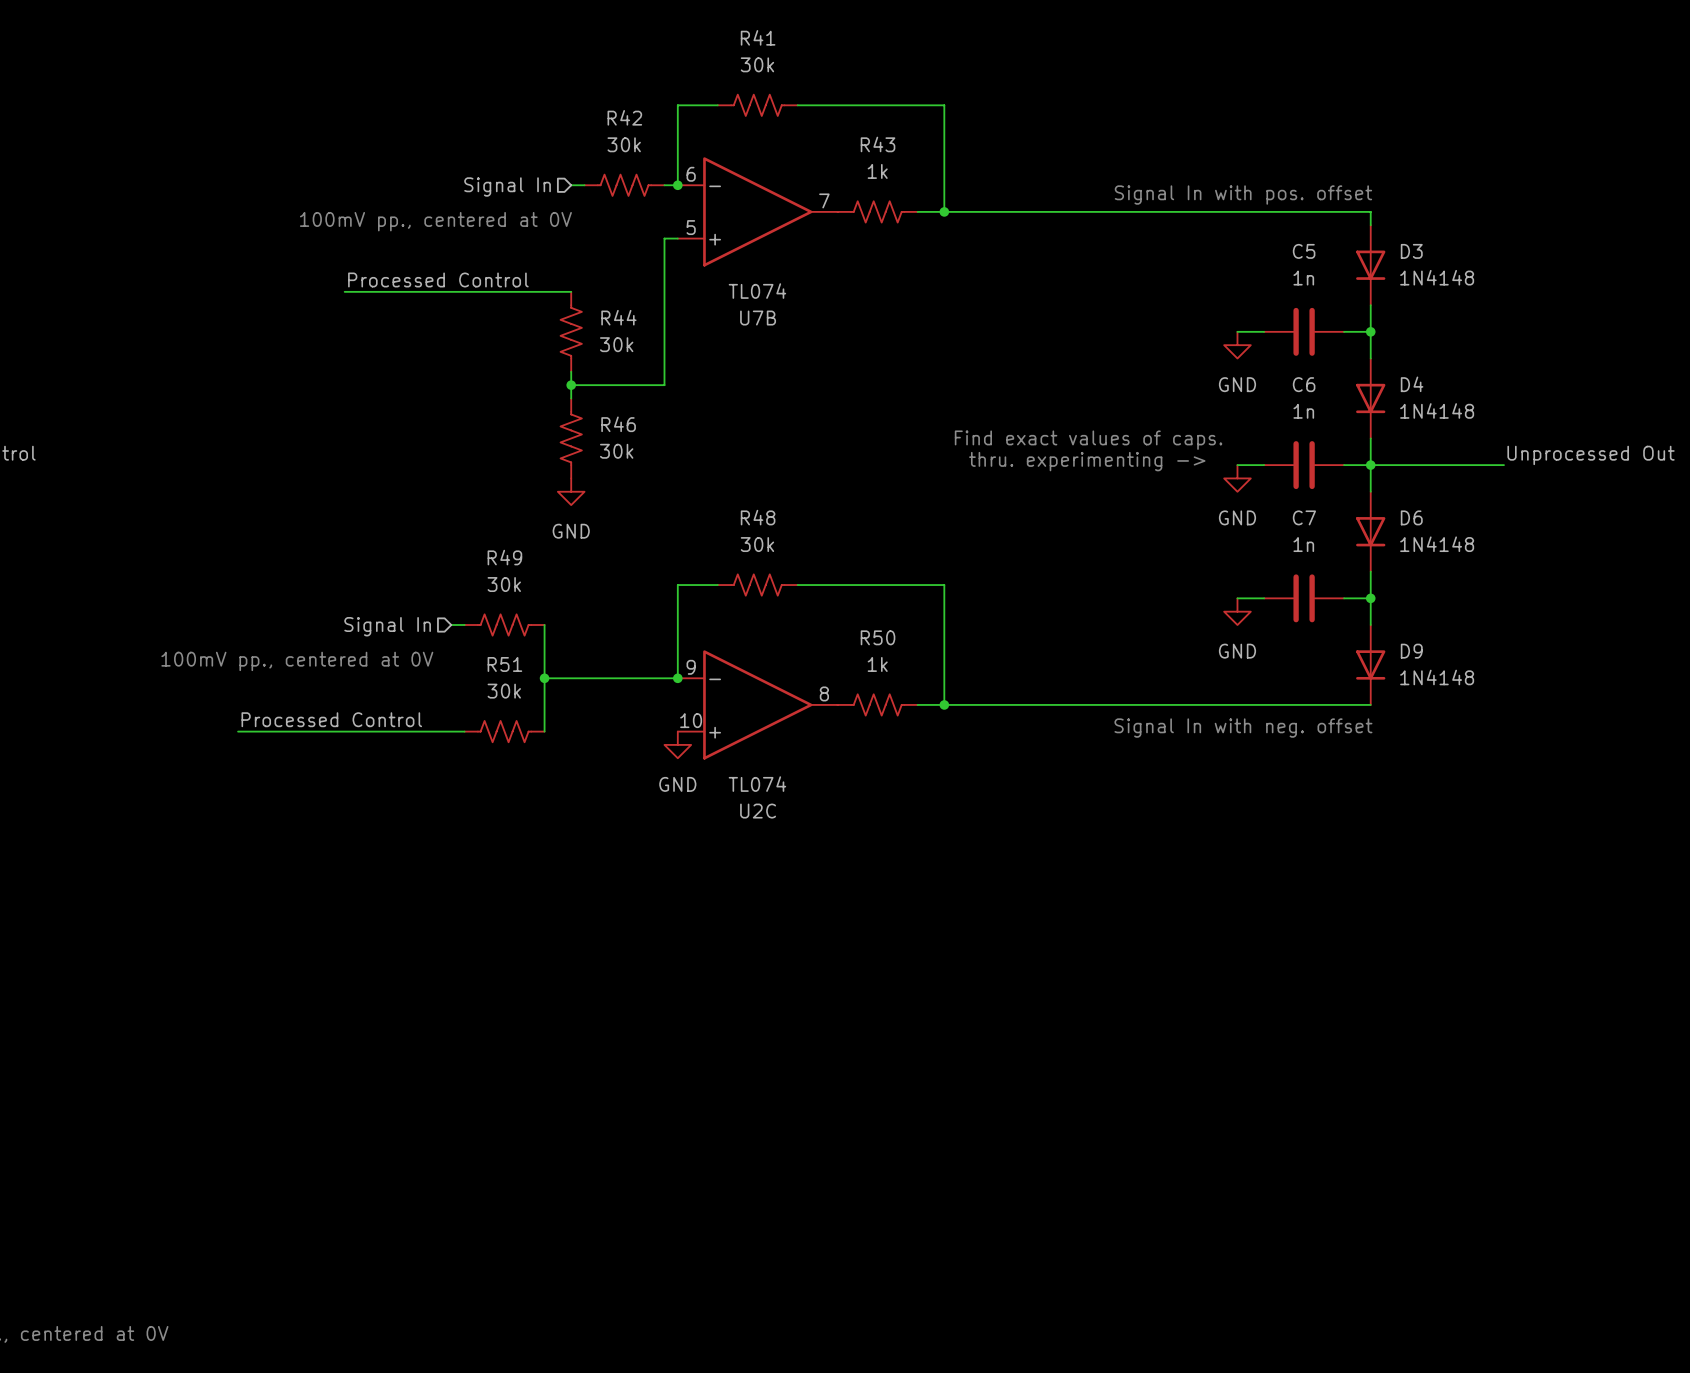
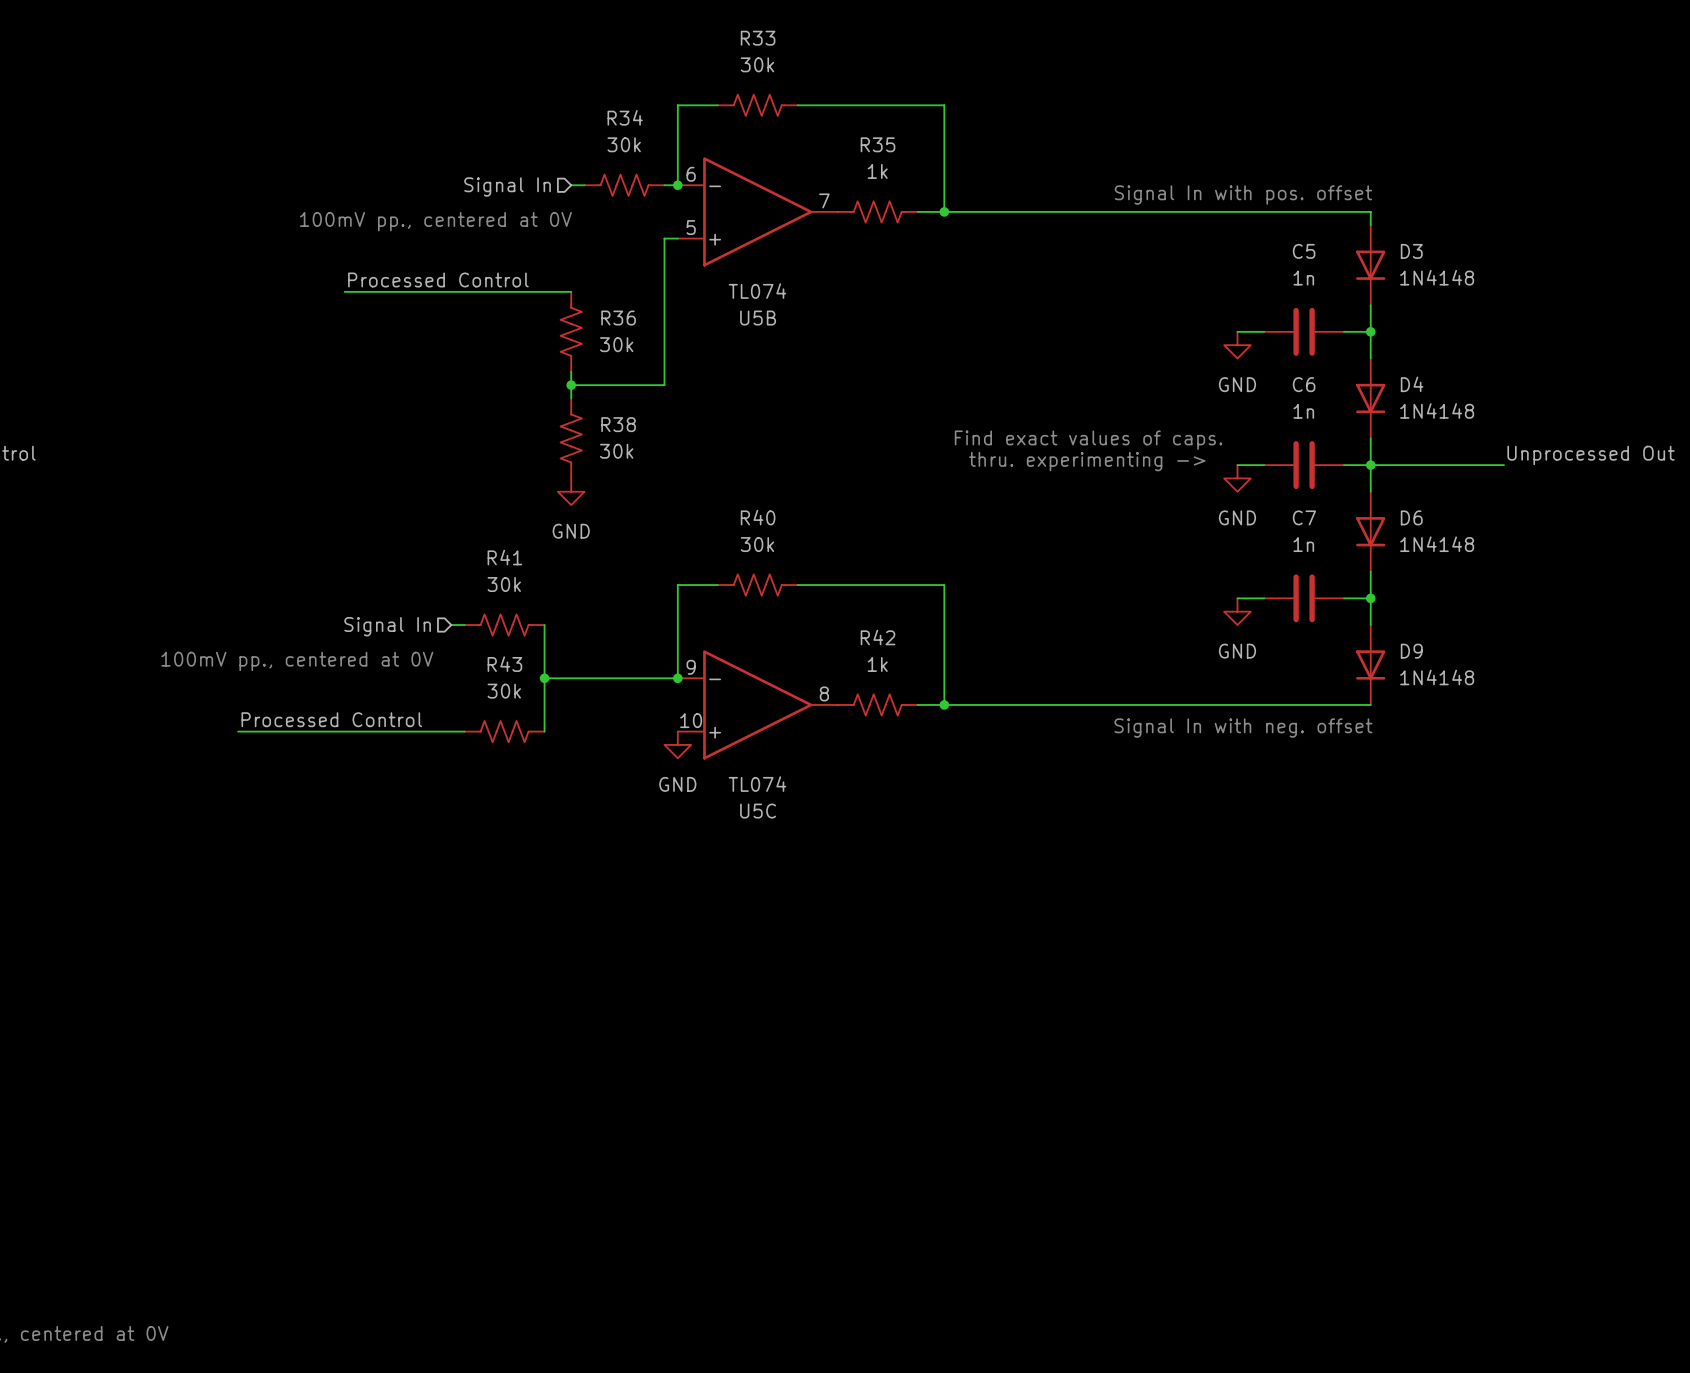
R41 name: R41 (758, 37) -> R33 (758, 38)
R42 name: R42 (624, 117) -> R34 (625, 117)
R43 name: R43 (878, 144) -> R35 (878, 144)
R44 name: R44 (618, 317) -> R36 (618, 318)
U7B name: U7B (758, 318) -> U5B (758, 318)
R46 name: R46 (618, 424) -> R38 (618, 424)
R48 name: R48 (758, 517) -> R40 (758, 517)
R49 name: R49 (504, 557) -> R41 (504, 557)
R50 name: R50 (878, 637) -> R42 (878, 637)
R51 name: R51 (504, 664) -> R43 (504, 664)
U2C name: U2C (758, 811) -> U5C (758, 811)

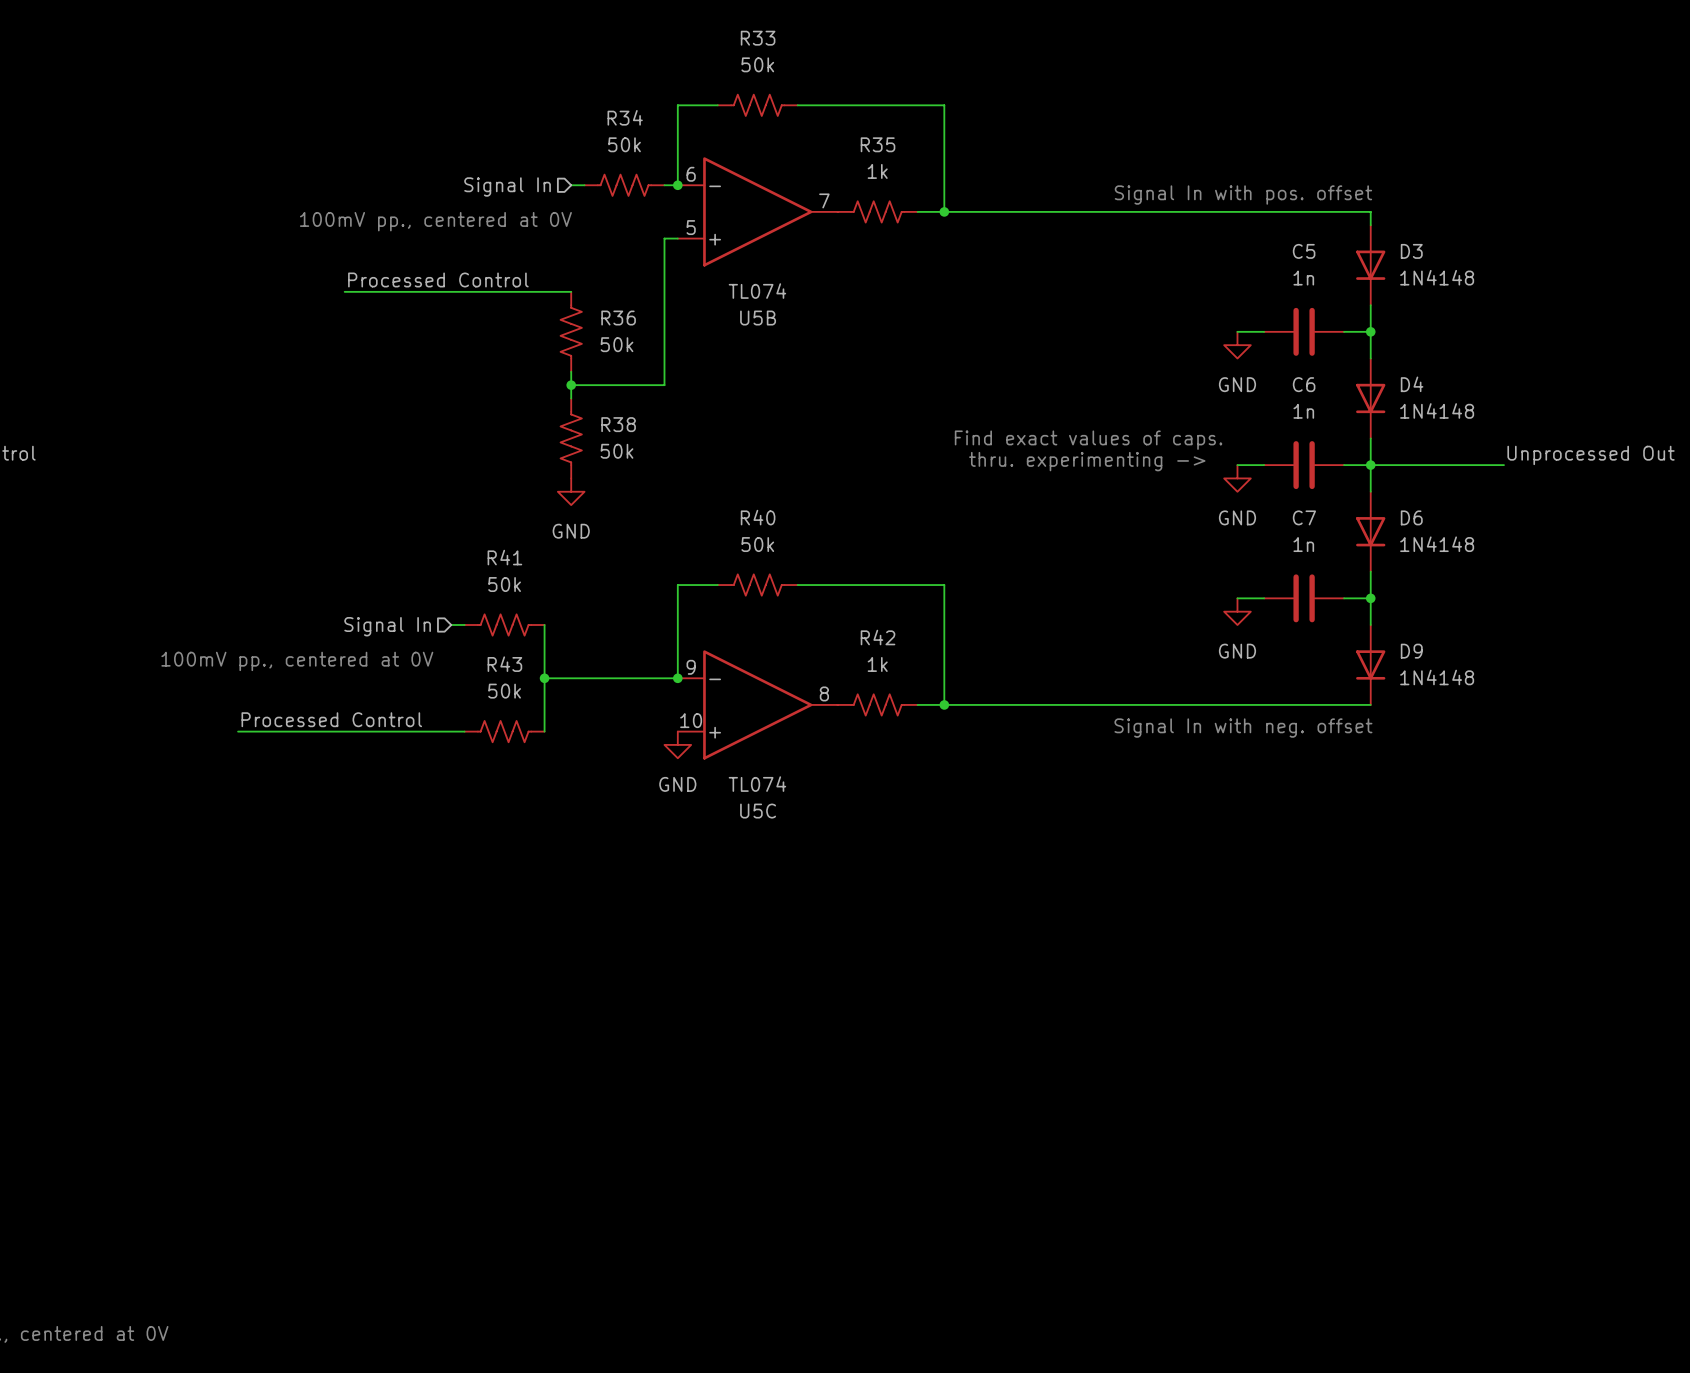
R33 value: 30k (757, 64) -> 50k (757, 64)
R34 value: 30k (624, 144) -> 50k (624, 144)
R36 value: 30k (616, 344) -> 50k (617, 344)
R38 value: 30k (616, 451) -> 50k (617, 451)
R40 value: 30k (757, 544) -> 50k (757, 544)
R41 value: 30k (504, 584) -> 50k (504, 584)
R43 value: 30k (504, 691) -> 50k (504, 691)

